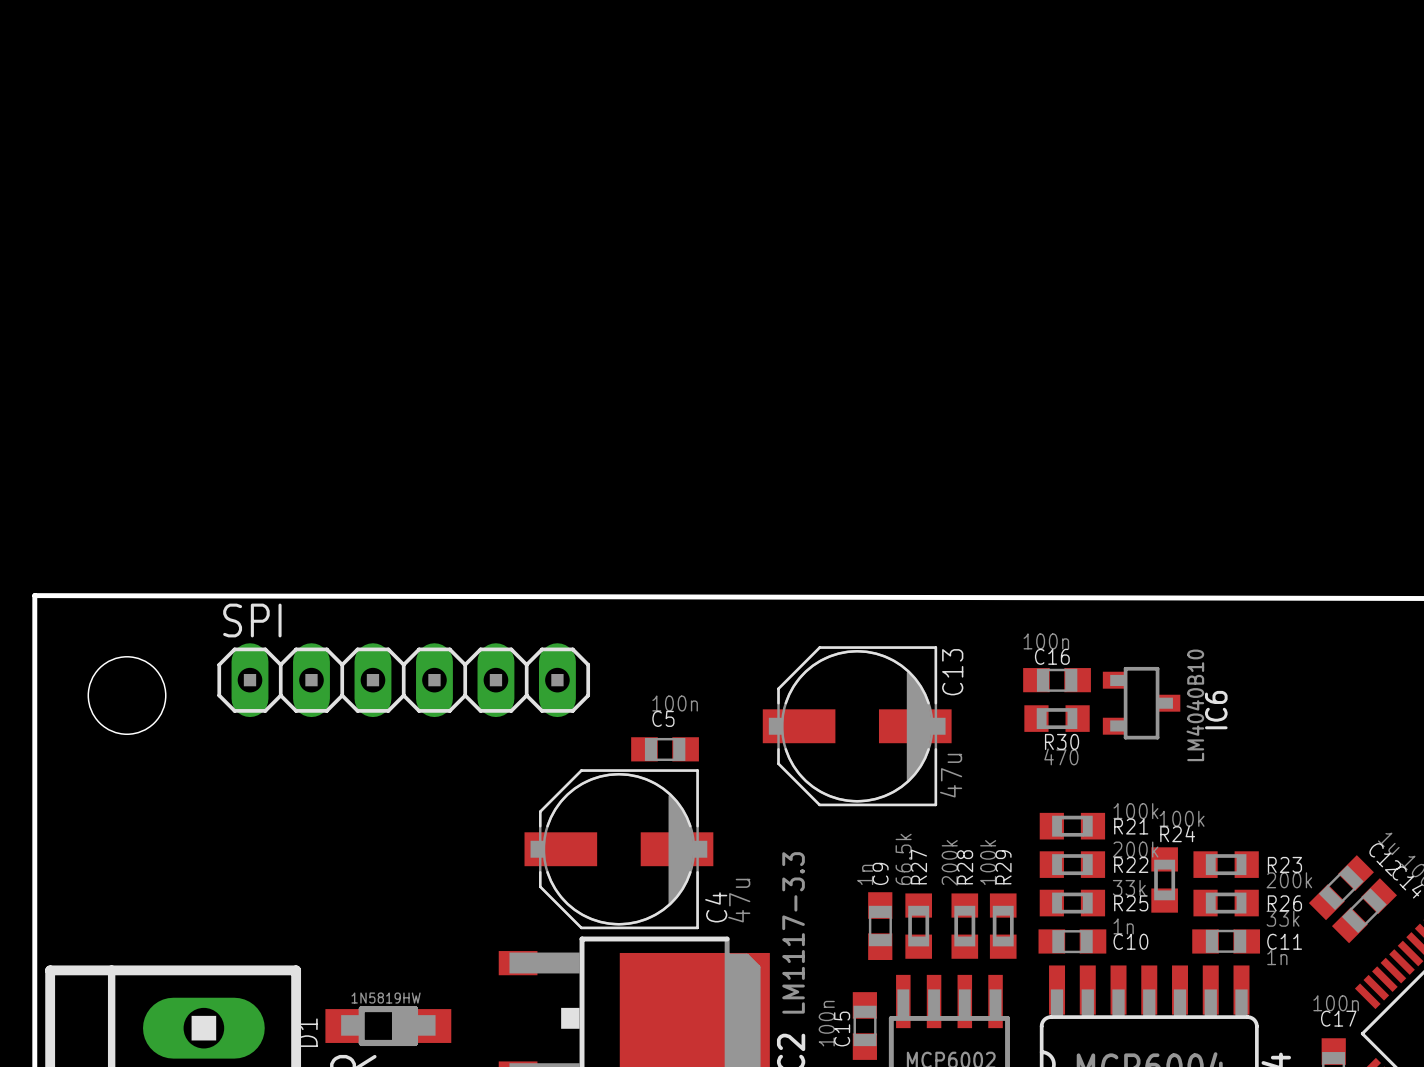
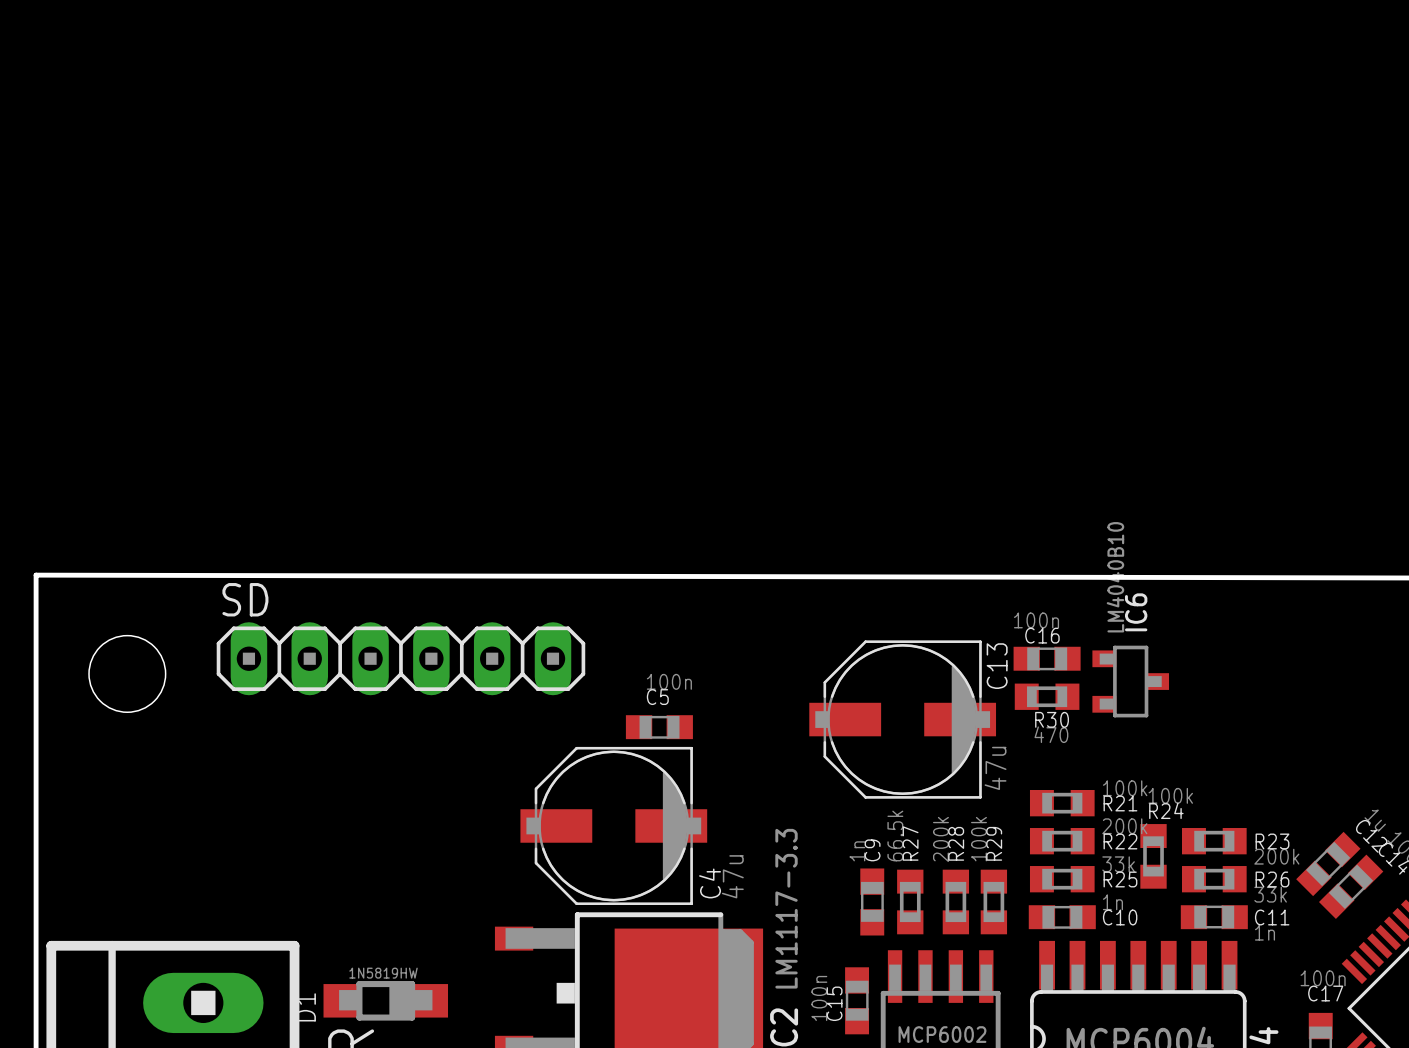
SPI name: SPI (252, 620) -> SD (245, 599)
IC6 value position: LM4040B10 (1195, 705) -> LM4040B10 (1115, 577)
IC6 name position: IC6 (1216, 710) -> IC6 (1136, 612)
C13 position: (857, 726) -> (902, 719)

